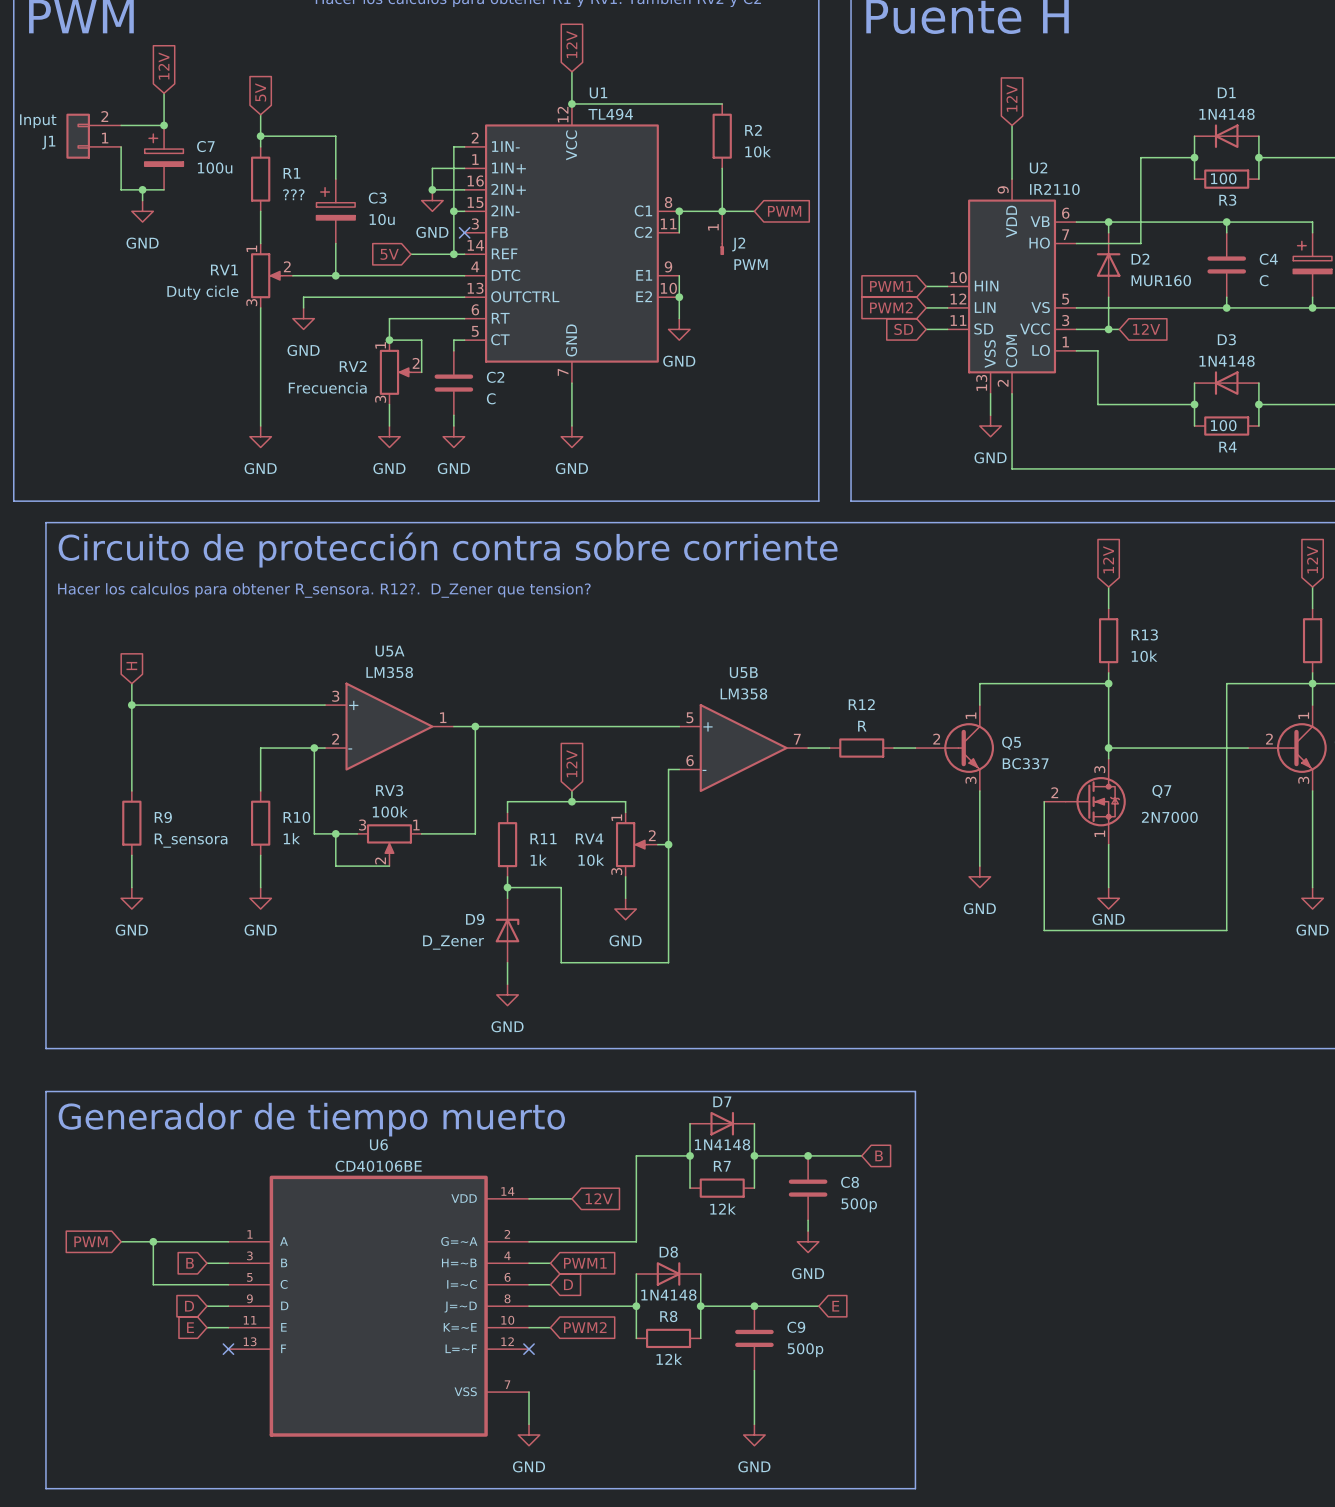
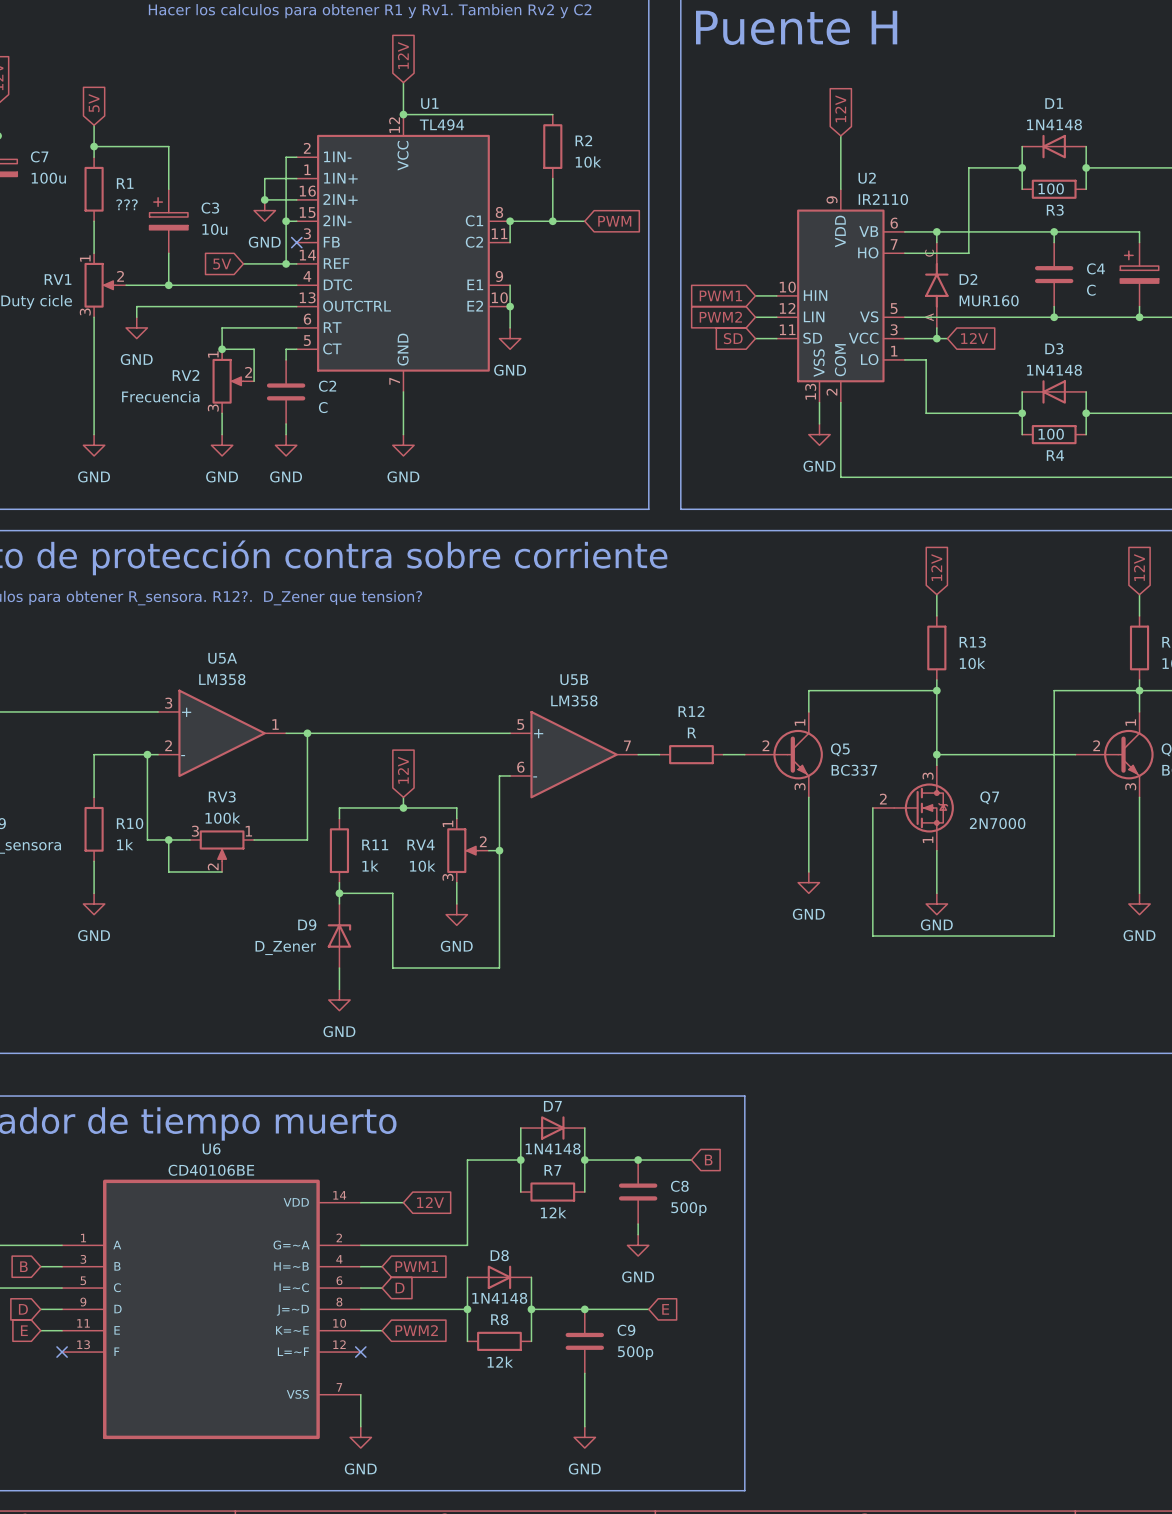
D2 symbol: [1096, 232, 1121, 298] -> [925, 242, 949, 328]
J2: PWM (722, 233) -> none

